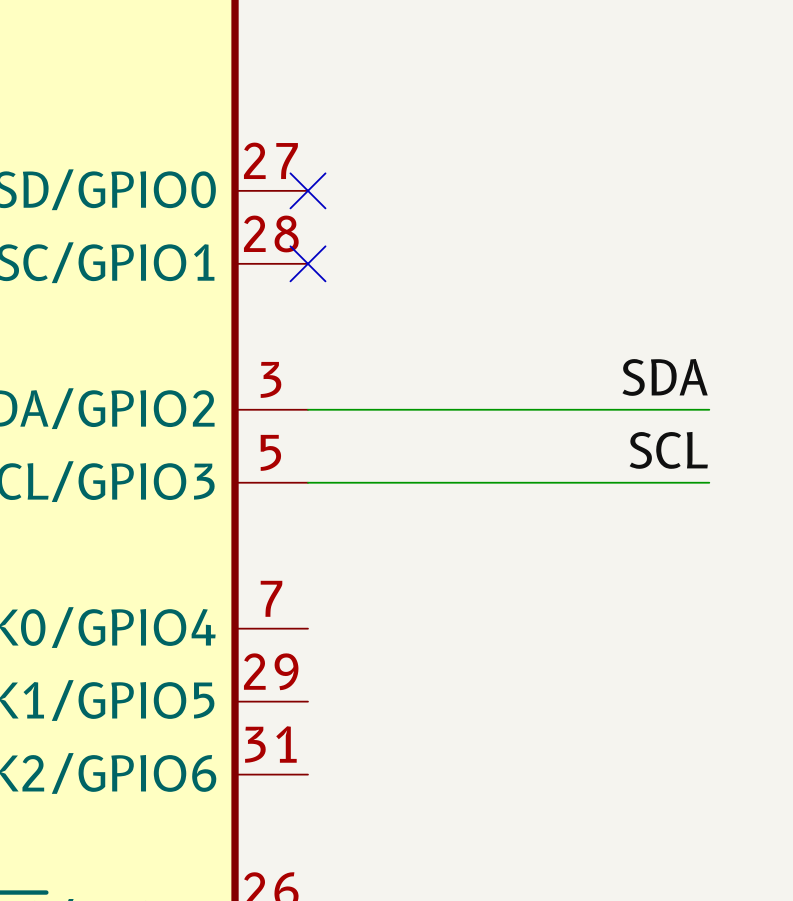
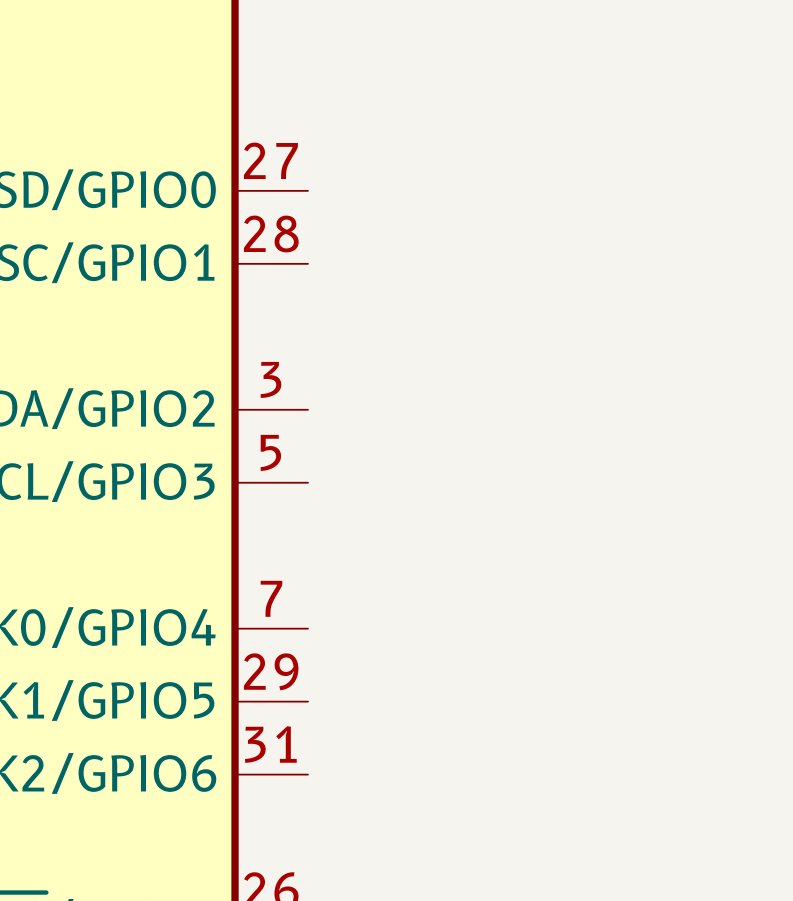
no-connect mark: (307, 190) -> none
no-connect mark: (307, 263) -> none
label: SDA (665, 377) -> none
wire: (307, 409) (709, 409) -> none
label: SCL (668, 450) -> none
wire: (307, 482) (709, 482) -> none

